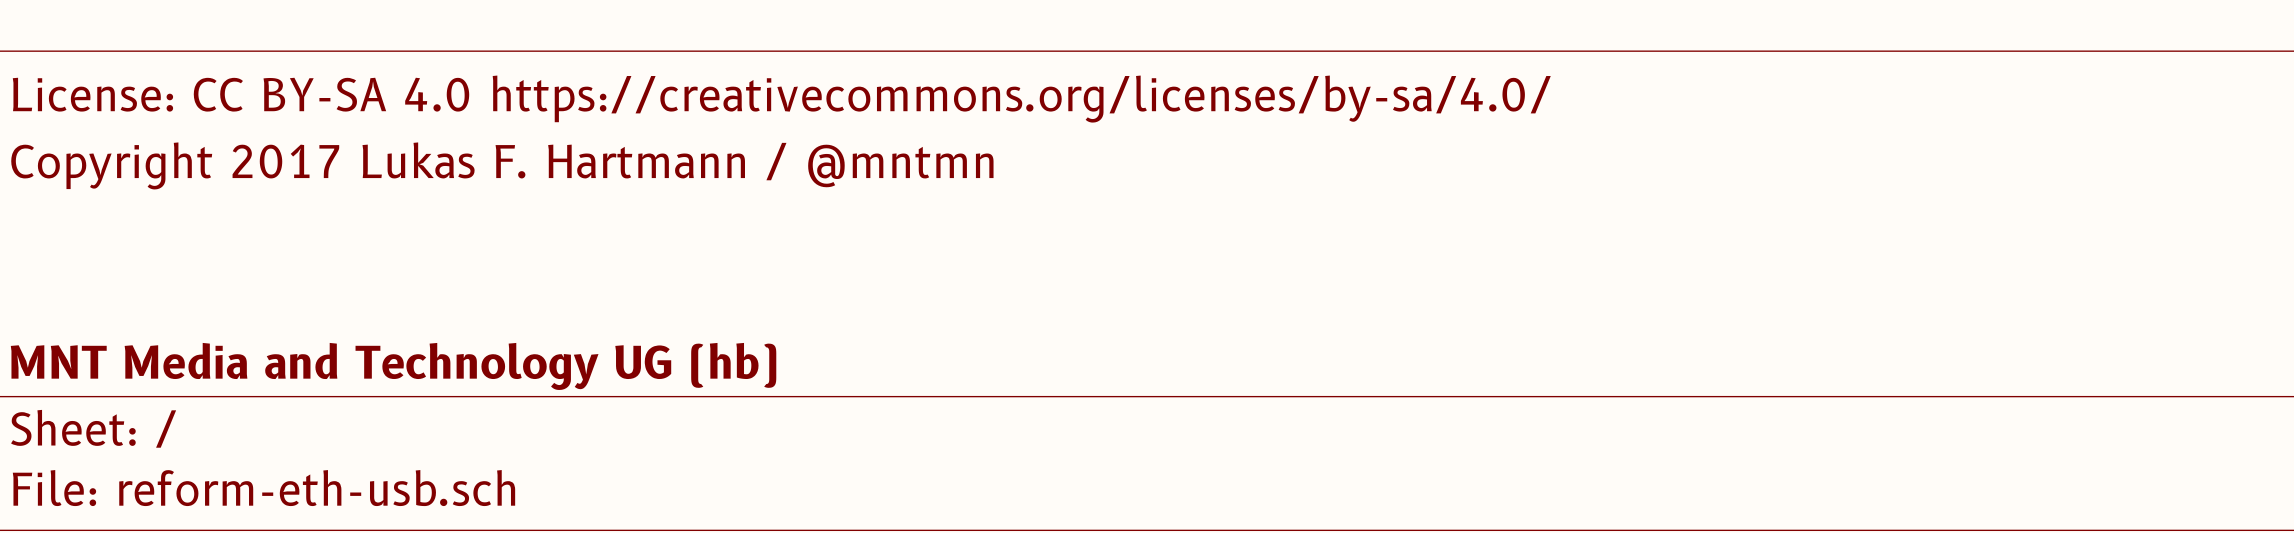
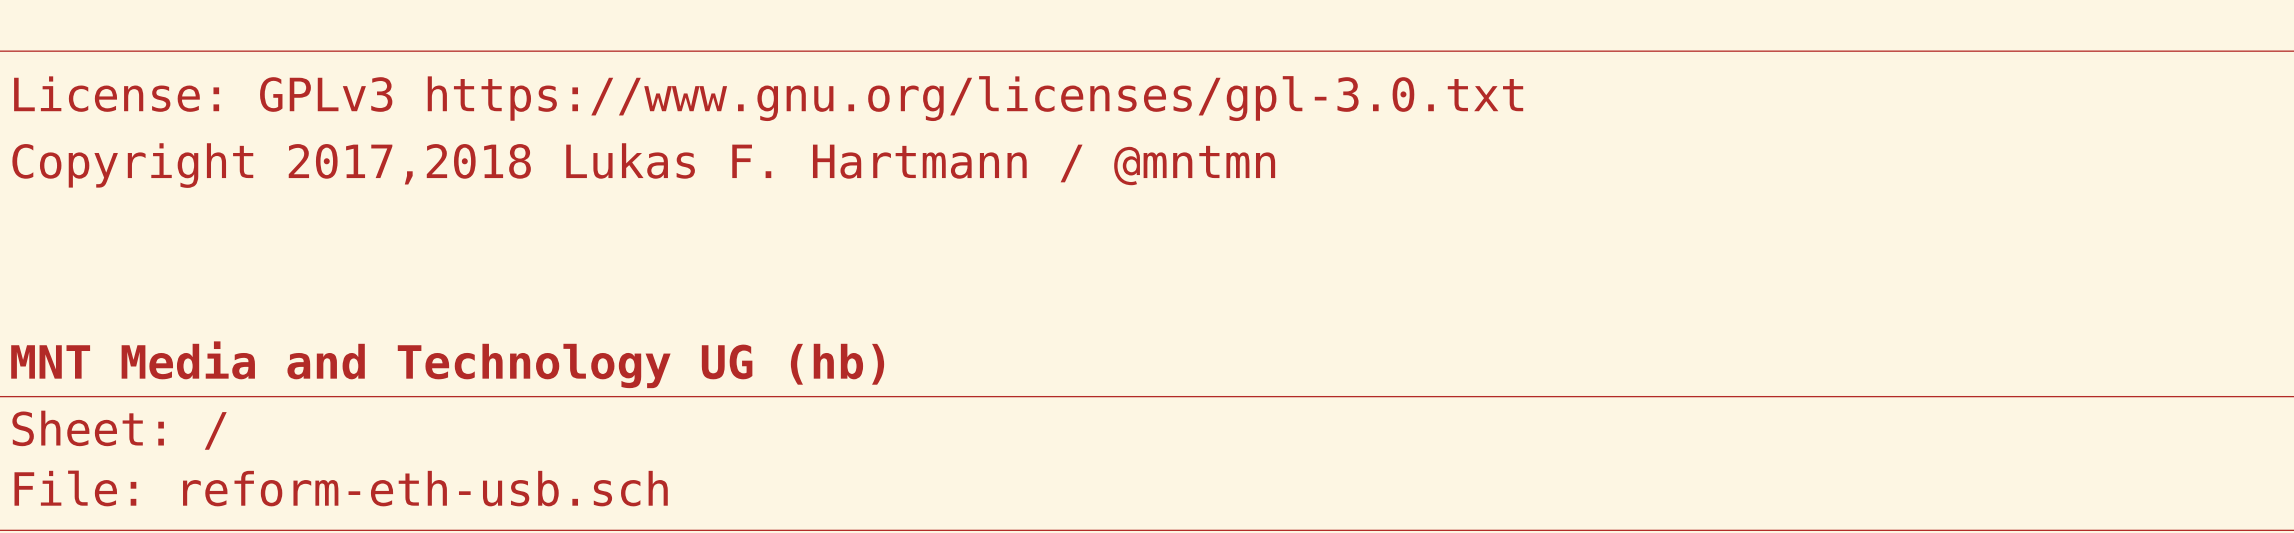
title block: License: CC BY-SA 4.0 https://creativecommons.org/licenses/by-sa/4.0/ (781, 99) -> License: GPLv3 https://www.gnu.org/licenses/gpl-3.0.txt (768, 98)
title block: Copyright 2017 Lukas F. Hartmann / @mntmn (502, 165) -> Copyright 2017,2018 Lukas F. Hartmann / @mntmn (643, 165)

